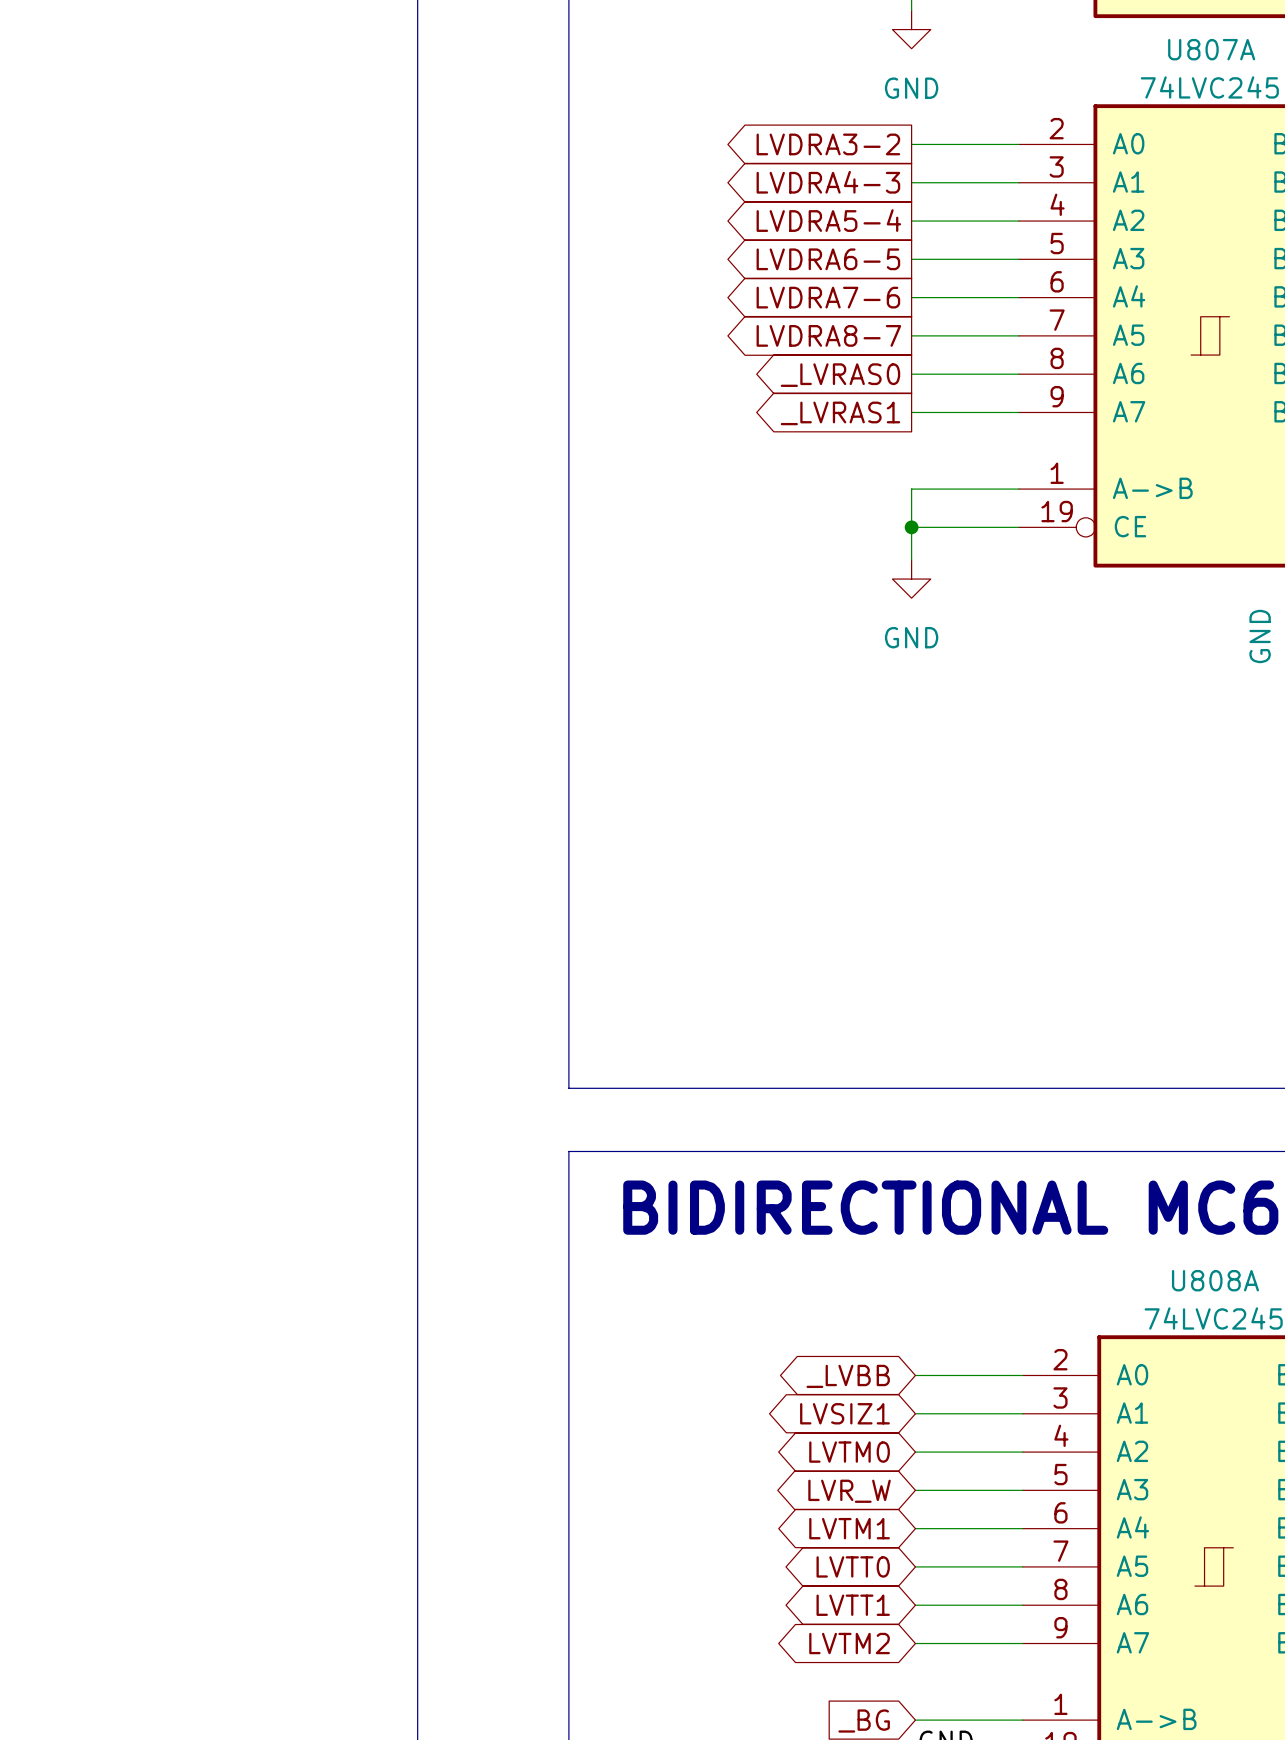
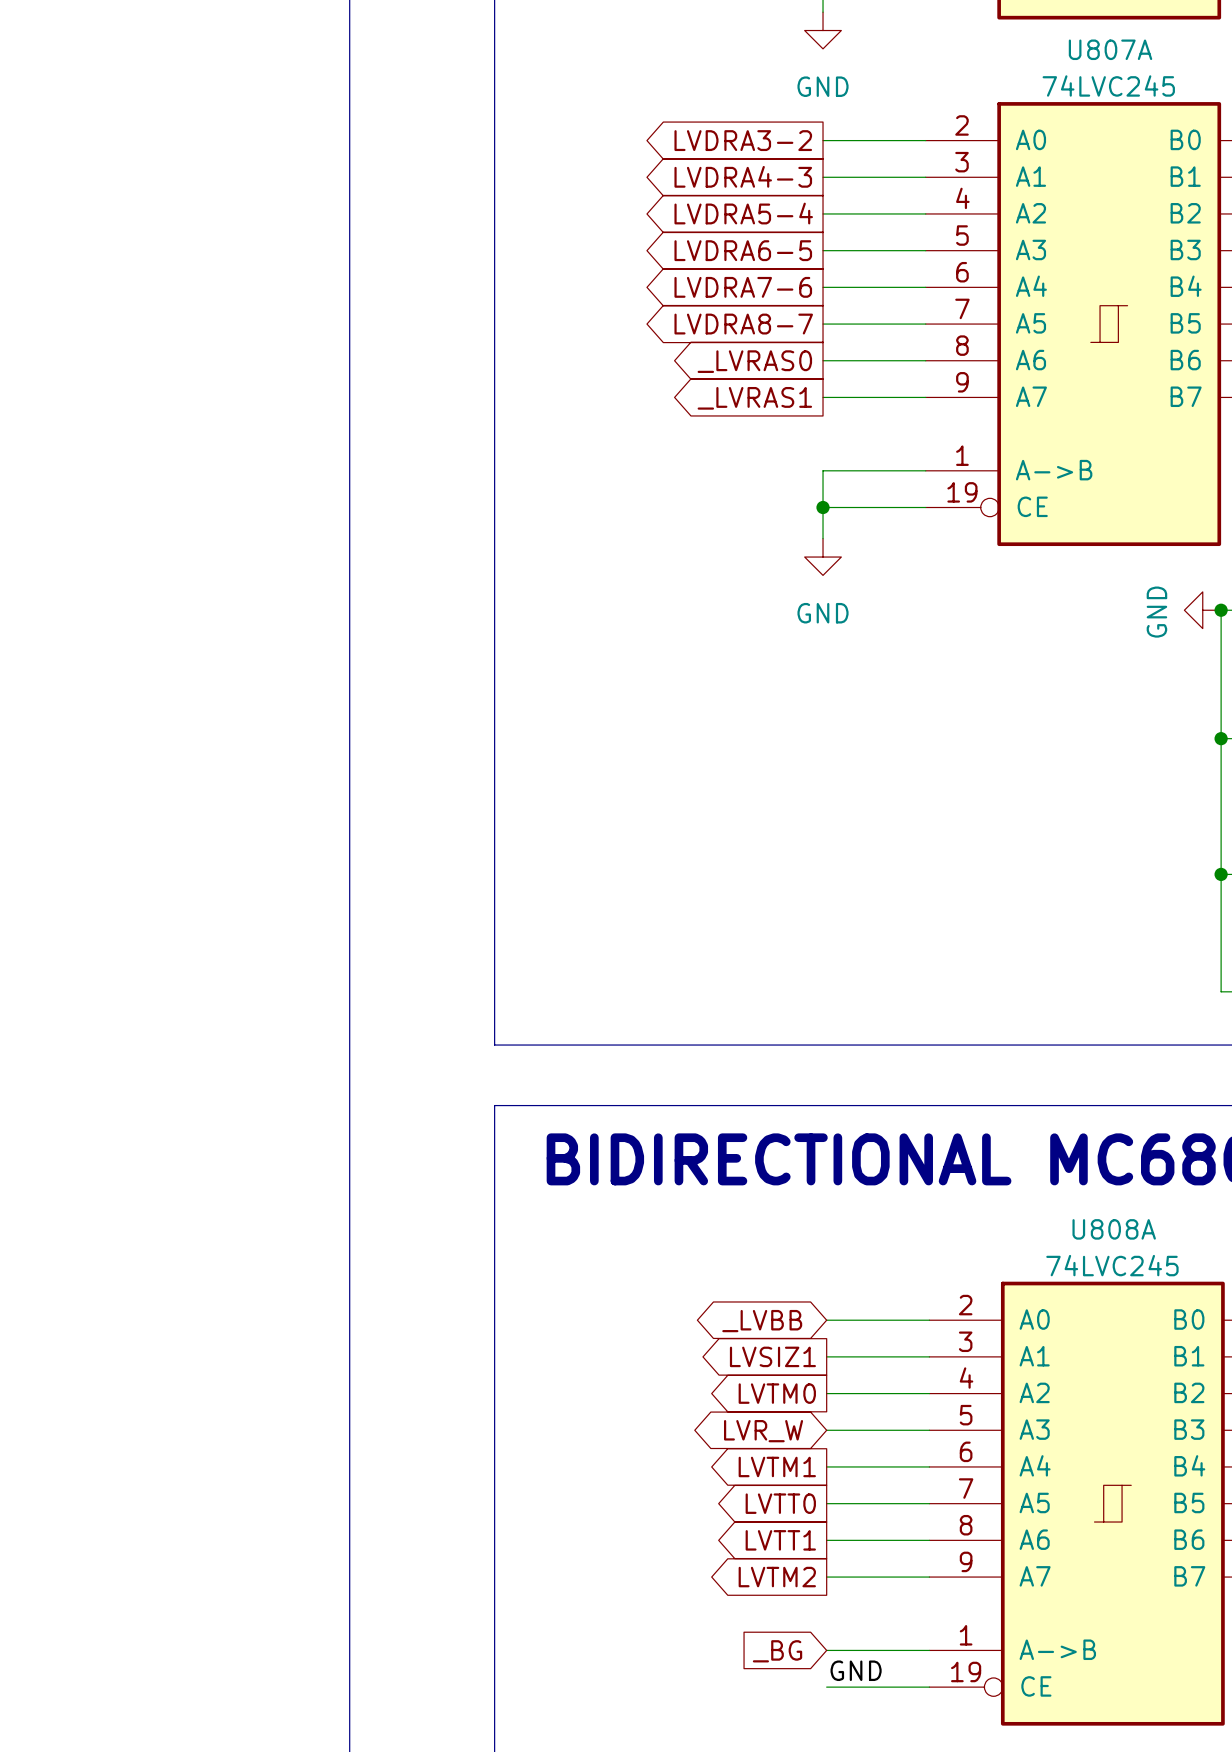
global label shape: bidirectional (844, 1413) -> output (772, 1356)
global label shape: bidirectional (849, 1452) -> output (777, 1393)
global label shape: bidirectional (849, 1528) -> output (777, 1466)
global label shape: bidirectional (853, 1566) -> output (780, 1503)
global label shape: bidirectional (853, 1605) -> output (780, 1540)
global label shape: bidirectional (849, 1643) -> output (777, 1577)

